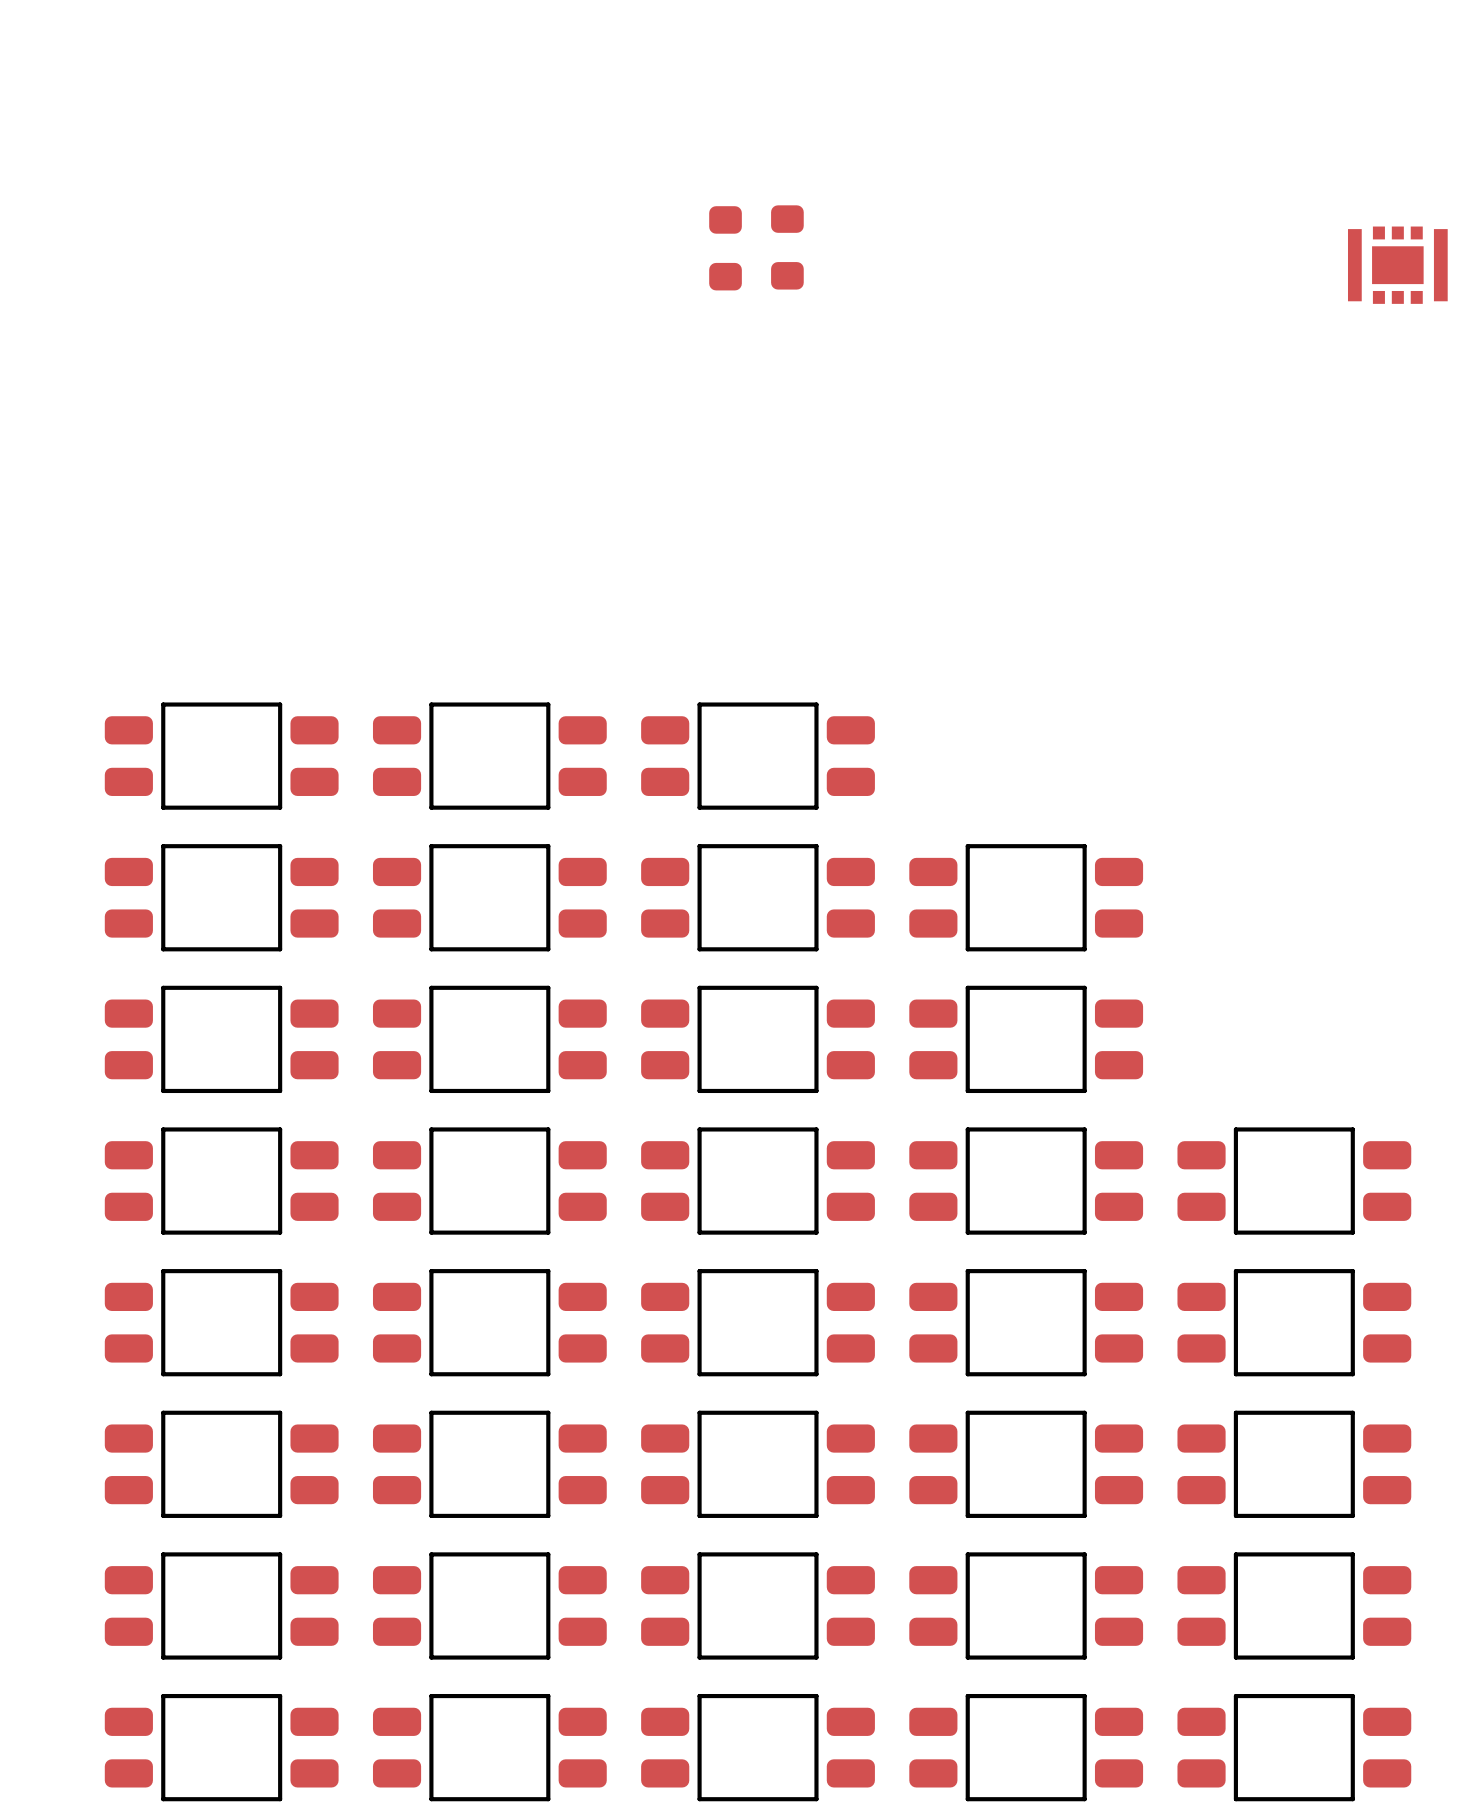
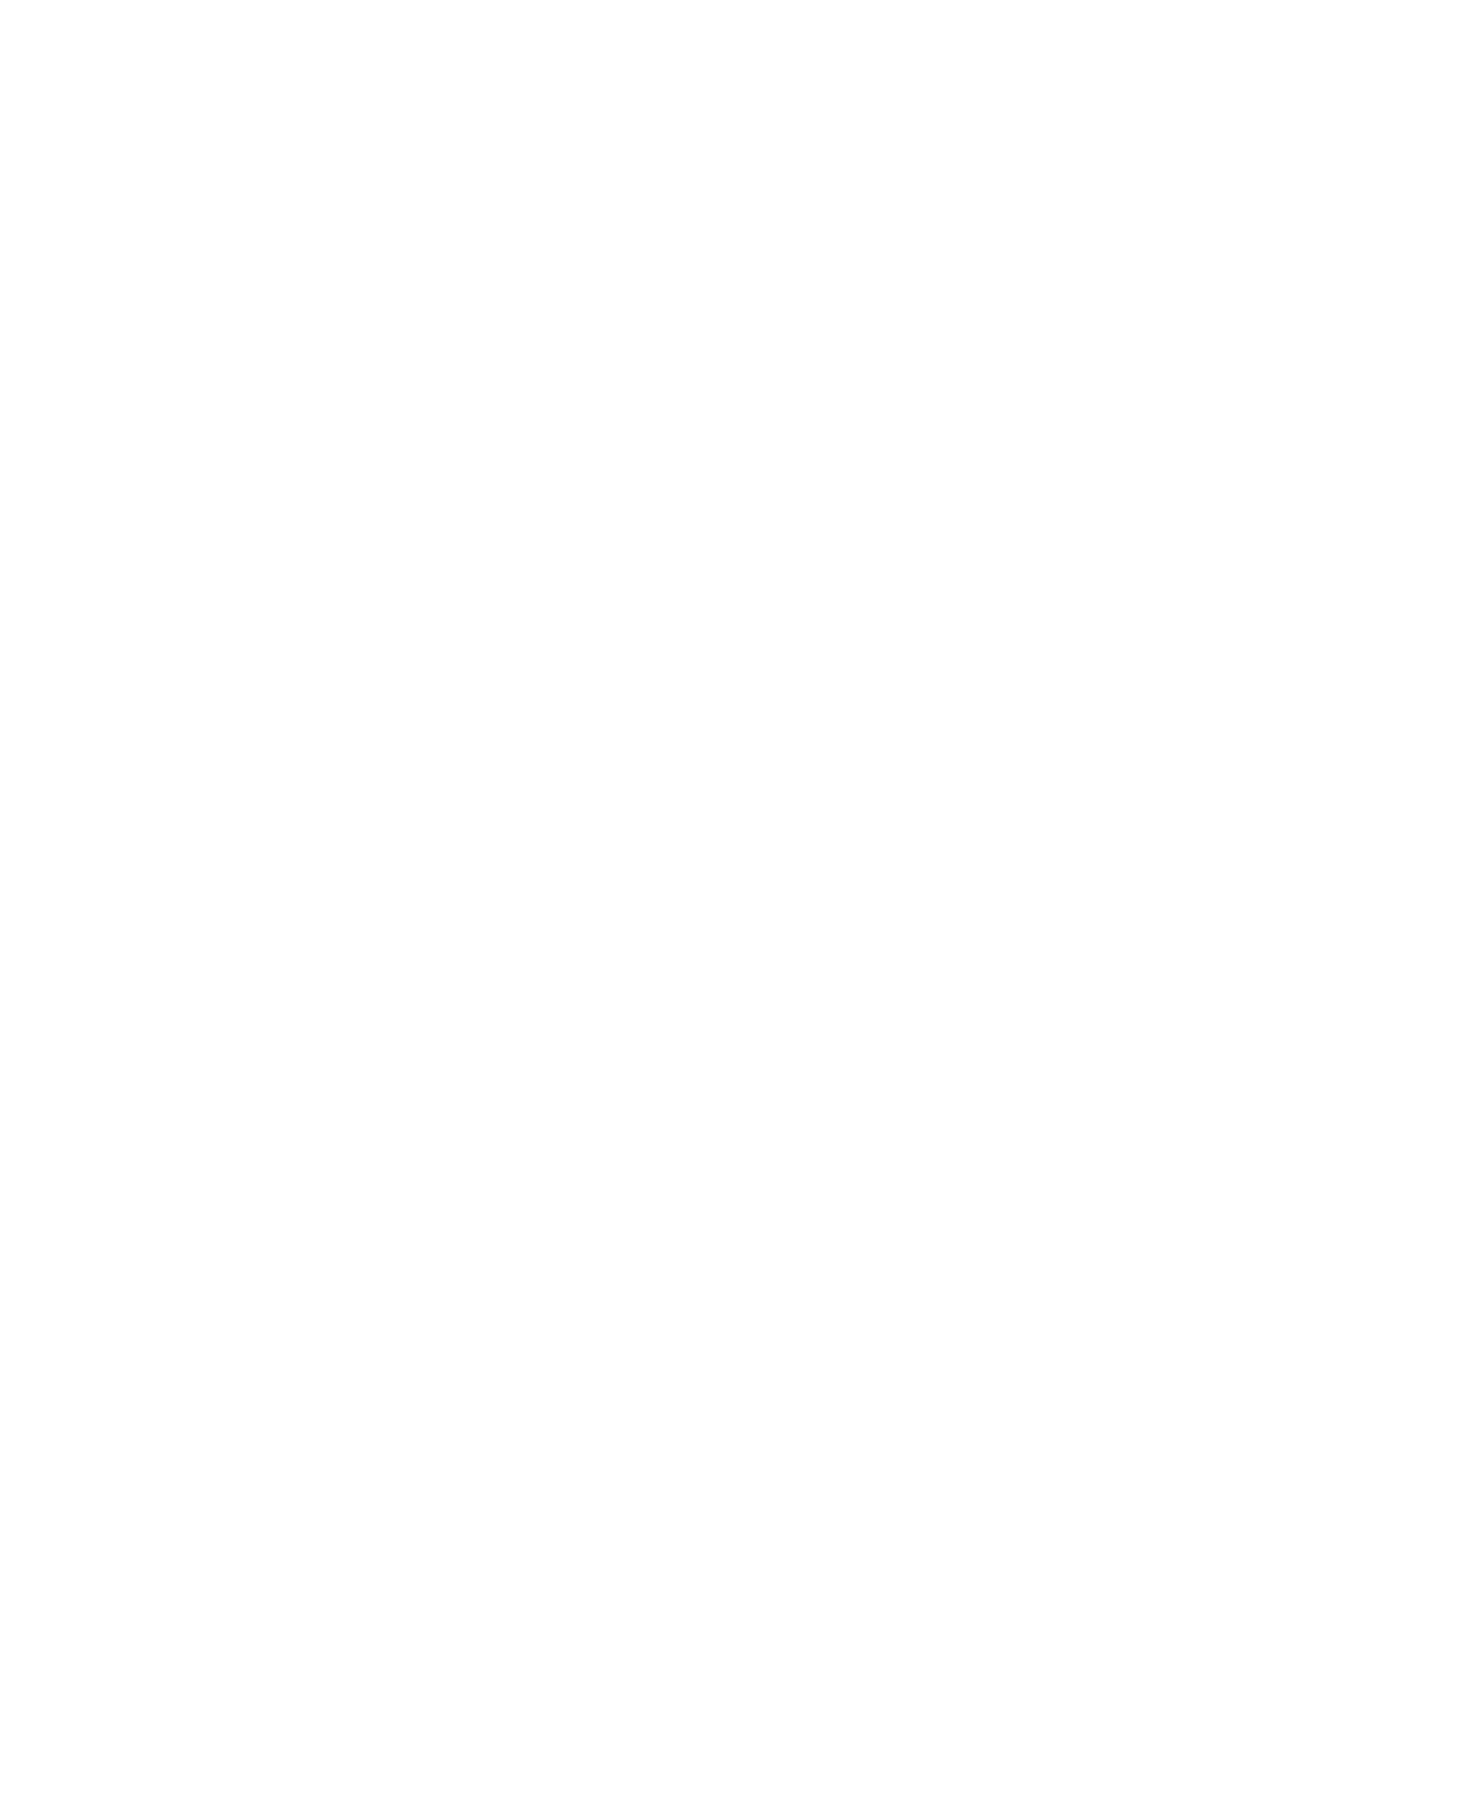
part: (787, 247) -> none
part: (725, 248) -> none
part: (1397, 265) -> none
part: (221, 756) -> none
part: (489, 756) -> none
part: (758, 756) -> none
part: (221, 897) -> none
part: (489, 897) -> none
part: (758, 897) -> none
part: (1026, 897) -> none
part: (221, 1039) -> none
part: (489, 1039) -> none
part: (758, 1039) -> none
part: (1026, 1039) -> none
part: (221, 1181) -> none
part: (489, 1181) -> none
part: (758, 1181) -> none
part: (1026, 1181) -> none
part: (1294, 1181) -> none
part: (221, 1322) -> none
part: (489, 1322) -> none
part: (758, 1322) -> none
part: (1026, 1322) -> none
part: (1294, 1322) -> none
part: (221, 1464) -> none
part: (489, 1464) -> none
part: (758, 1464) -> none
part: (1026, 1464) -> none
part: (1294, 1464) -> none
part: (221, 1605) -> none
part: (489, 1605) -> none
part: (758, 1605) -> none
part: (1026, 1605) -> none
part: (1294, 1605) -> none
part: (221, 1747) -> none
part: (489, 1747) -> none
part: (758, 1747) -> none
part: (1026, 1747) -> none
part: (1294, 1747) -> none

